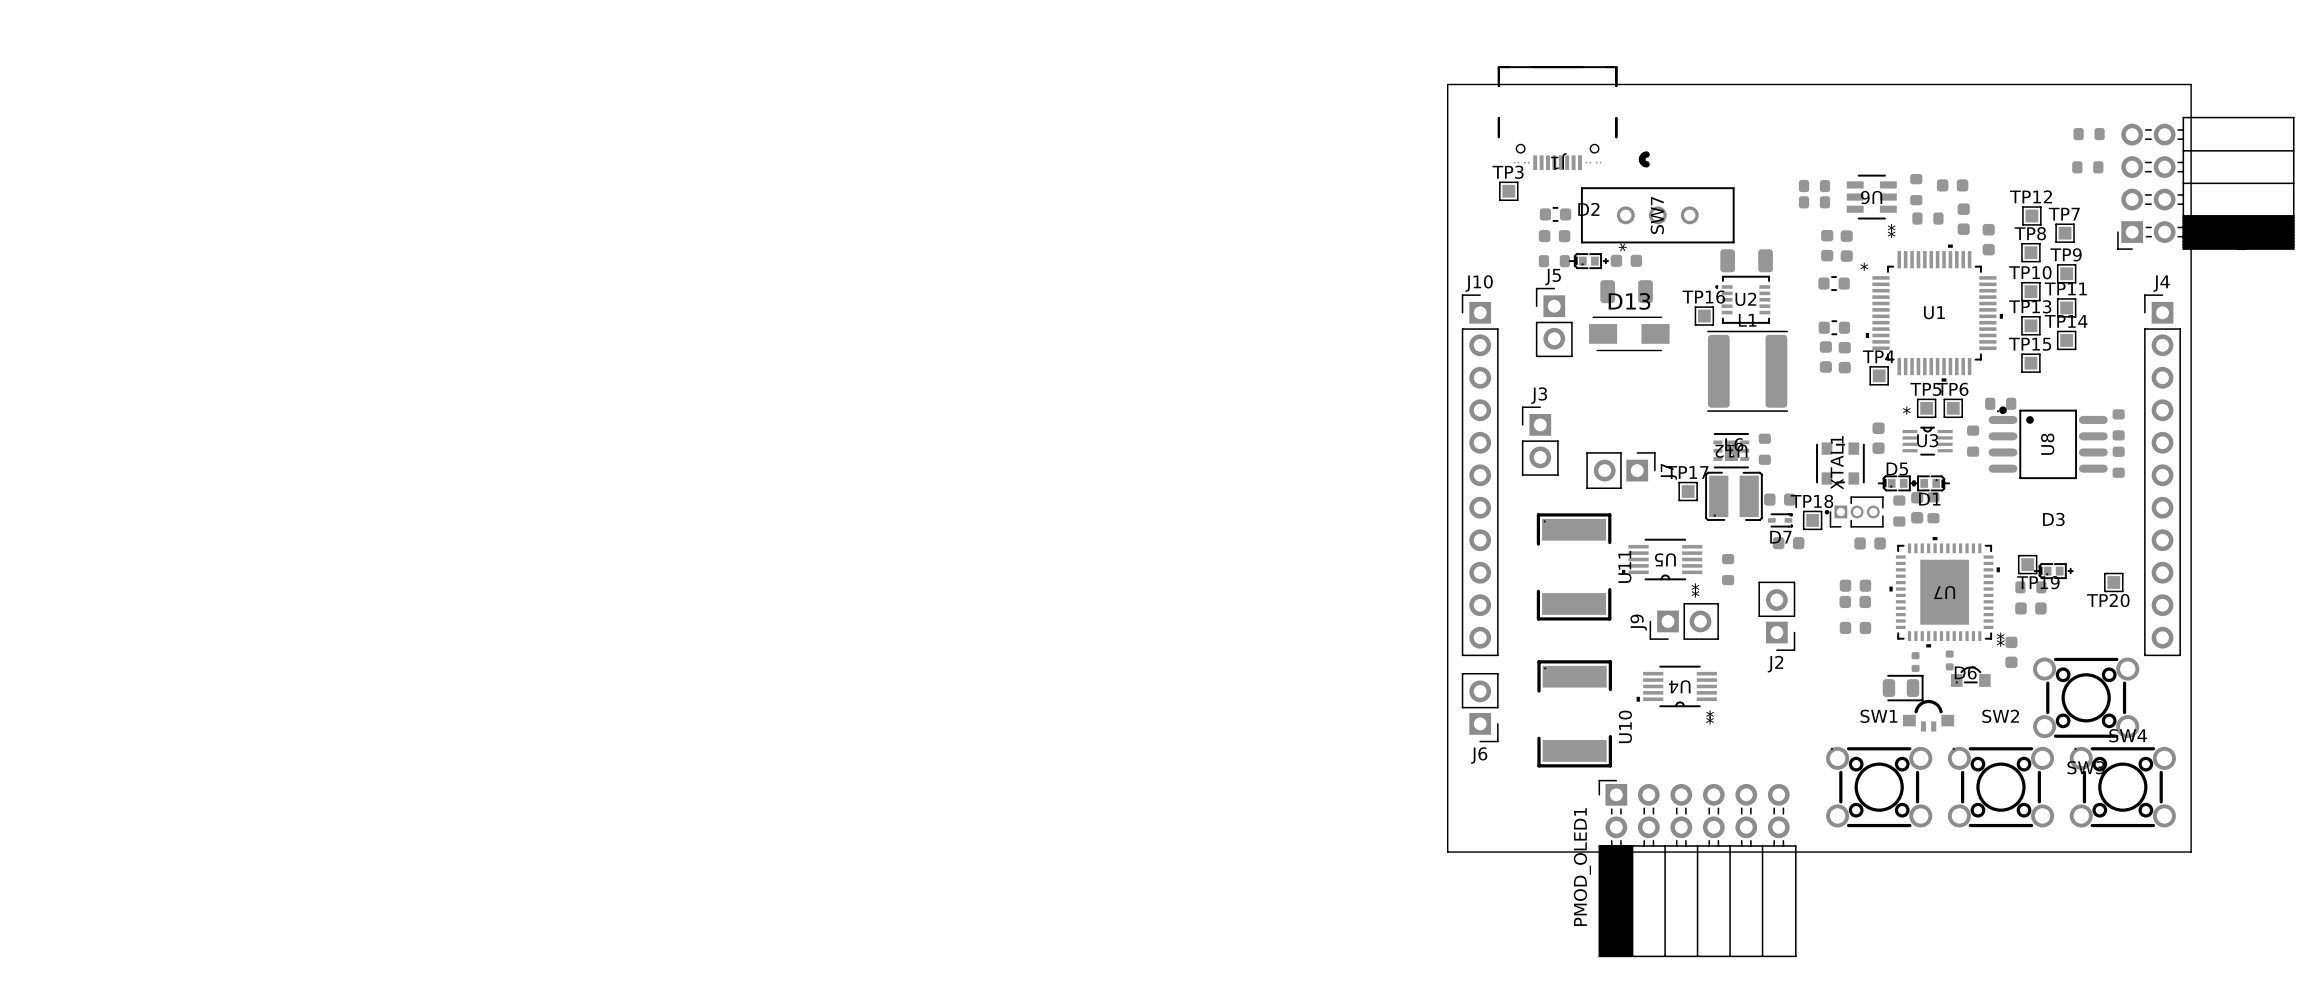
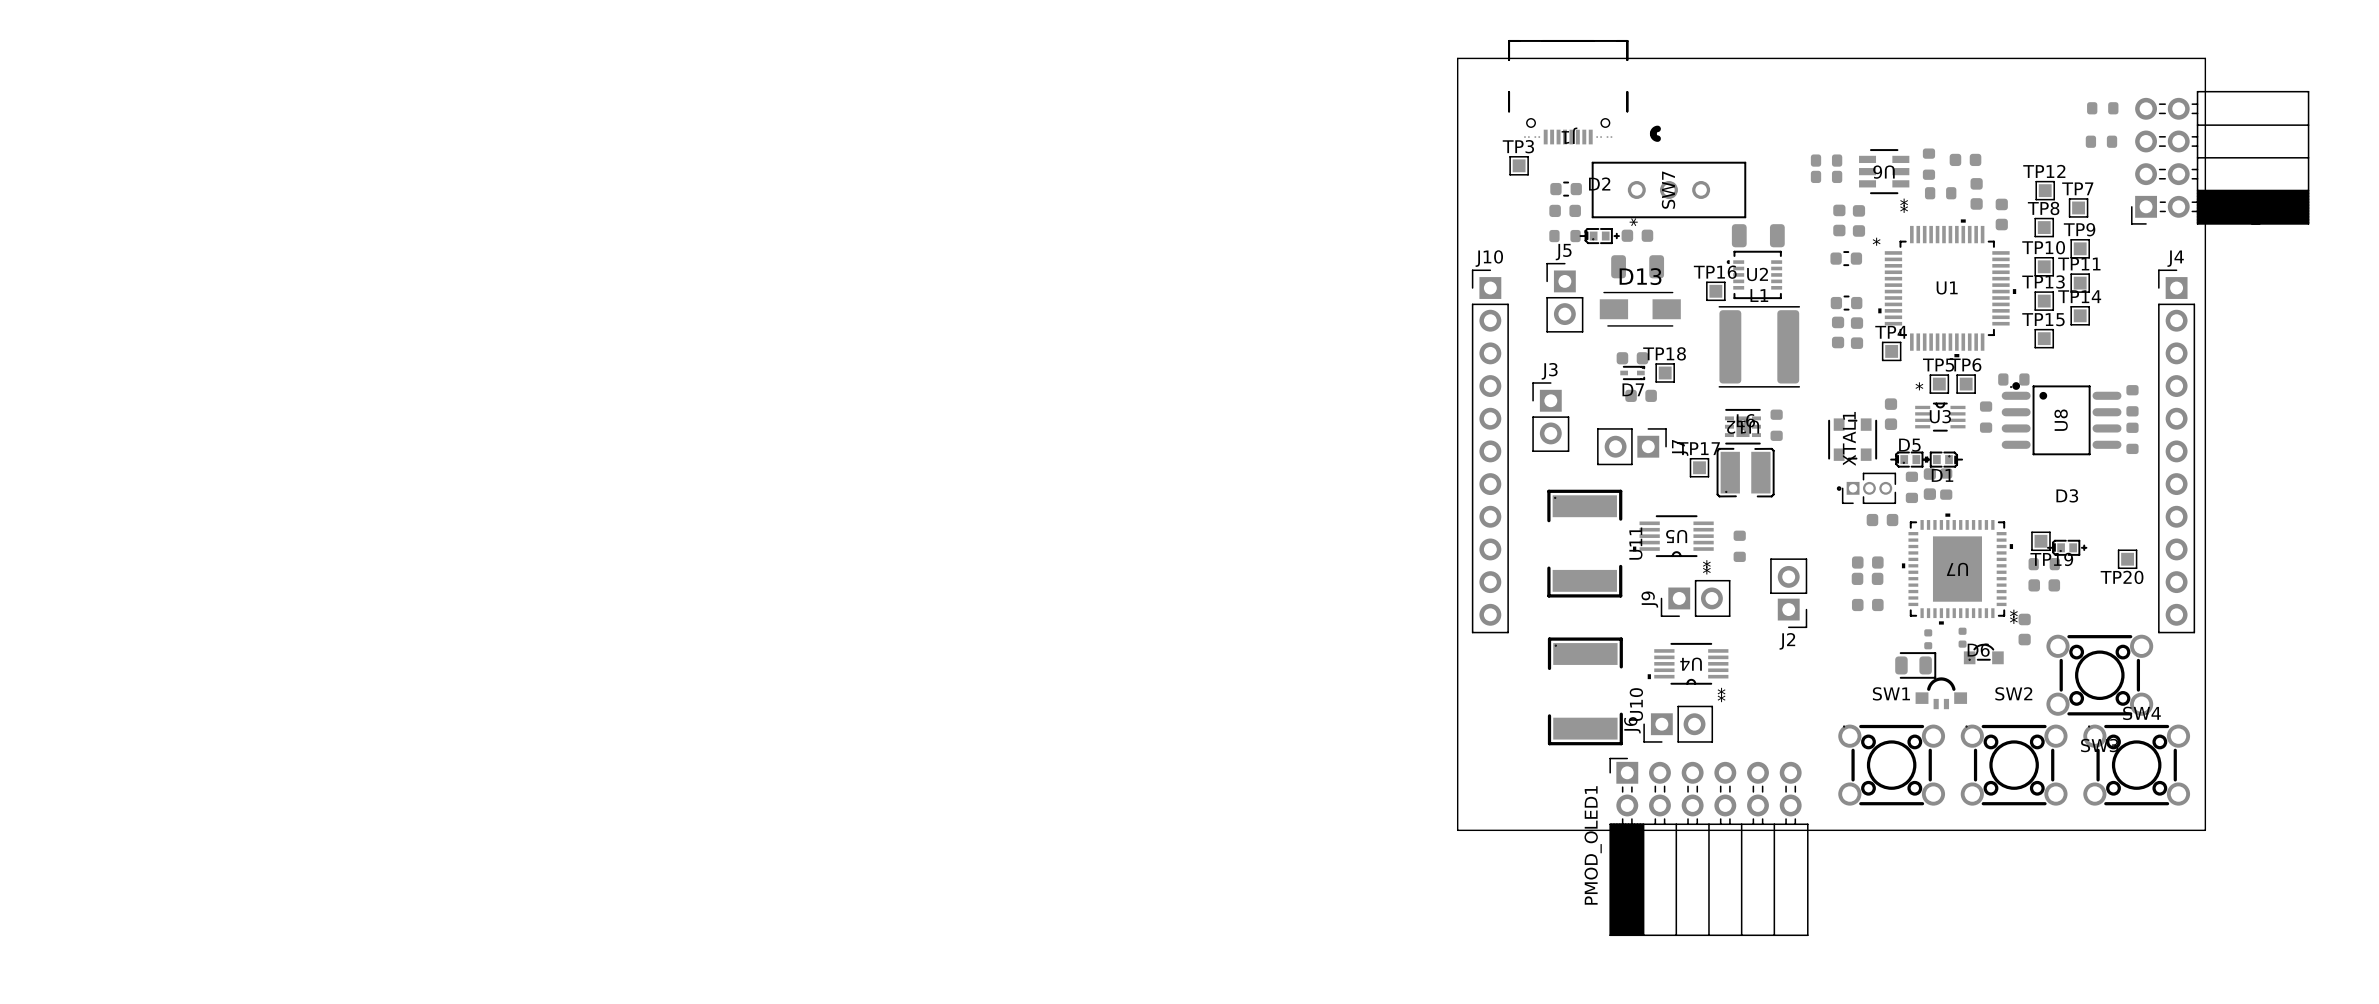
part: none -> (1632, 358)
part: none -> (1641, 395)
part: (1779, 499) -> none
D7 position: (1780, 520) -> (1632, 372)
TP18 position: (1812, 520) -> (1665, 372)
part: (1788, 543) -> none
J6 rotation: 0° (1480, 707) -> 90° clockwise (1678, 724)
J6 position: (1480, 707) -> (1678, 724)

